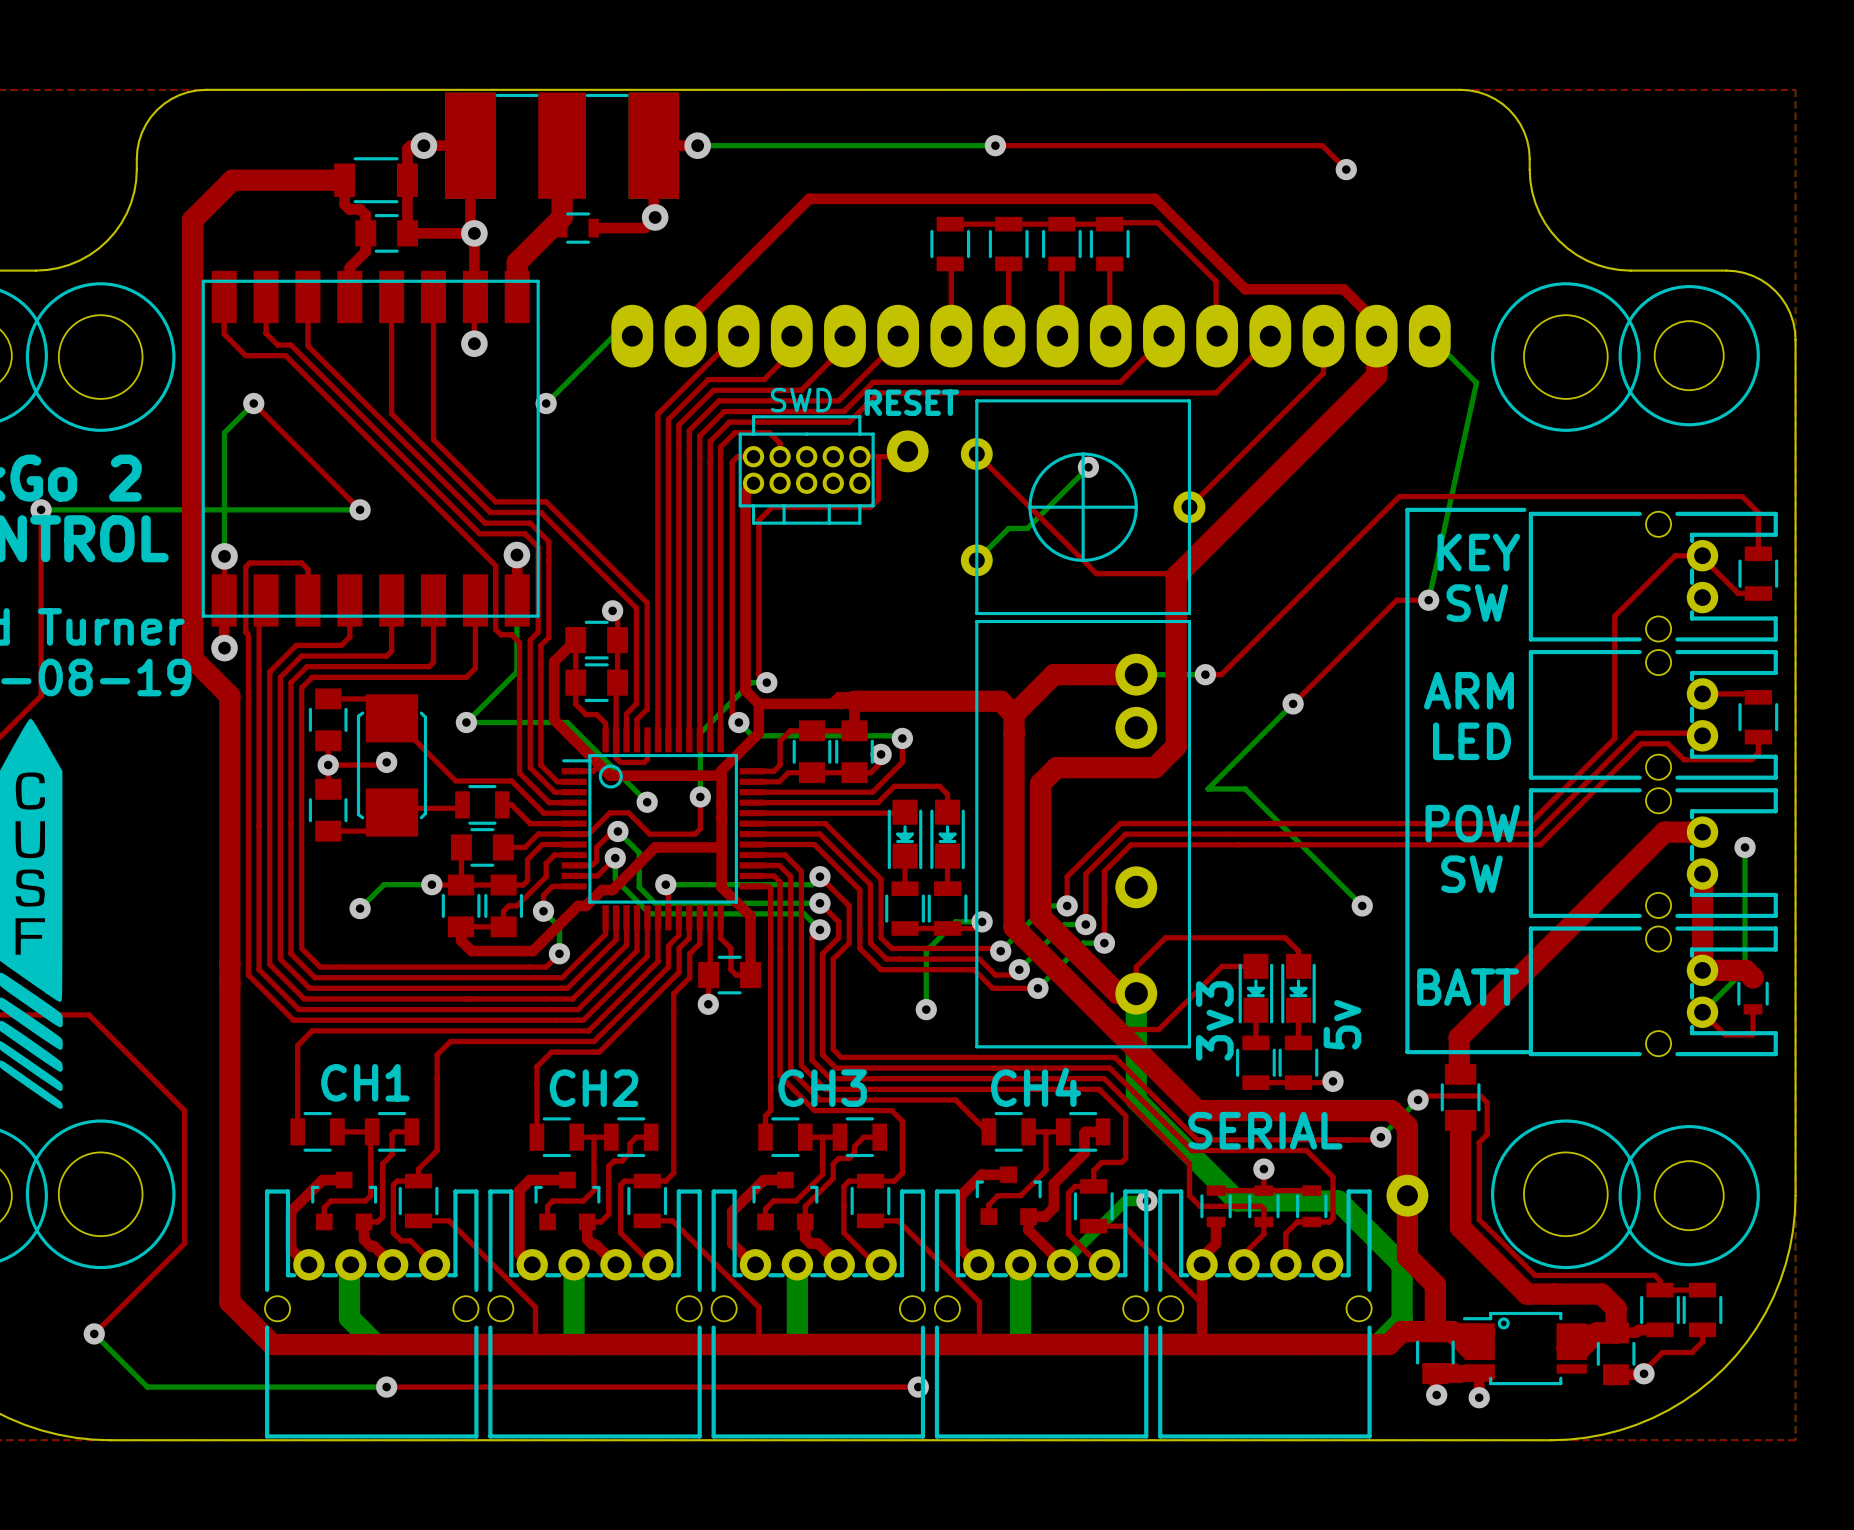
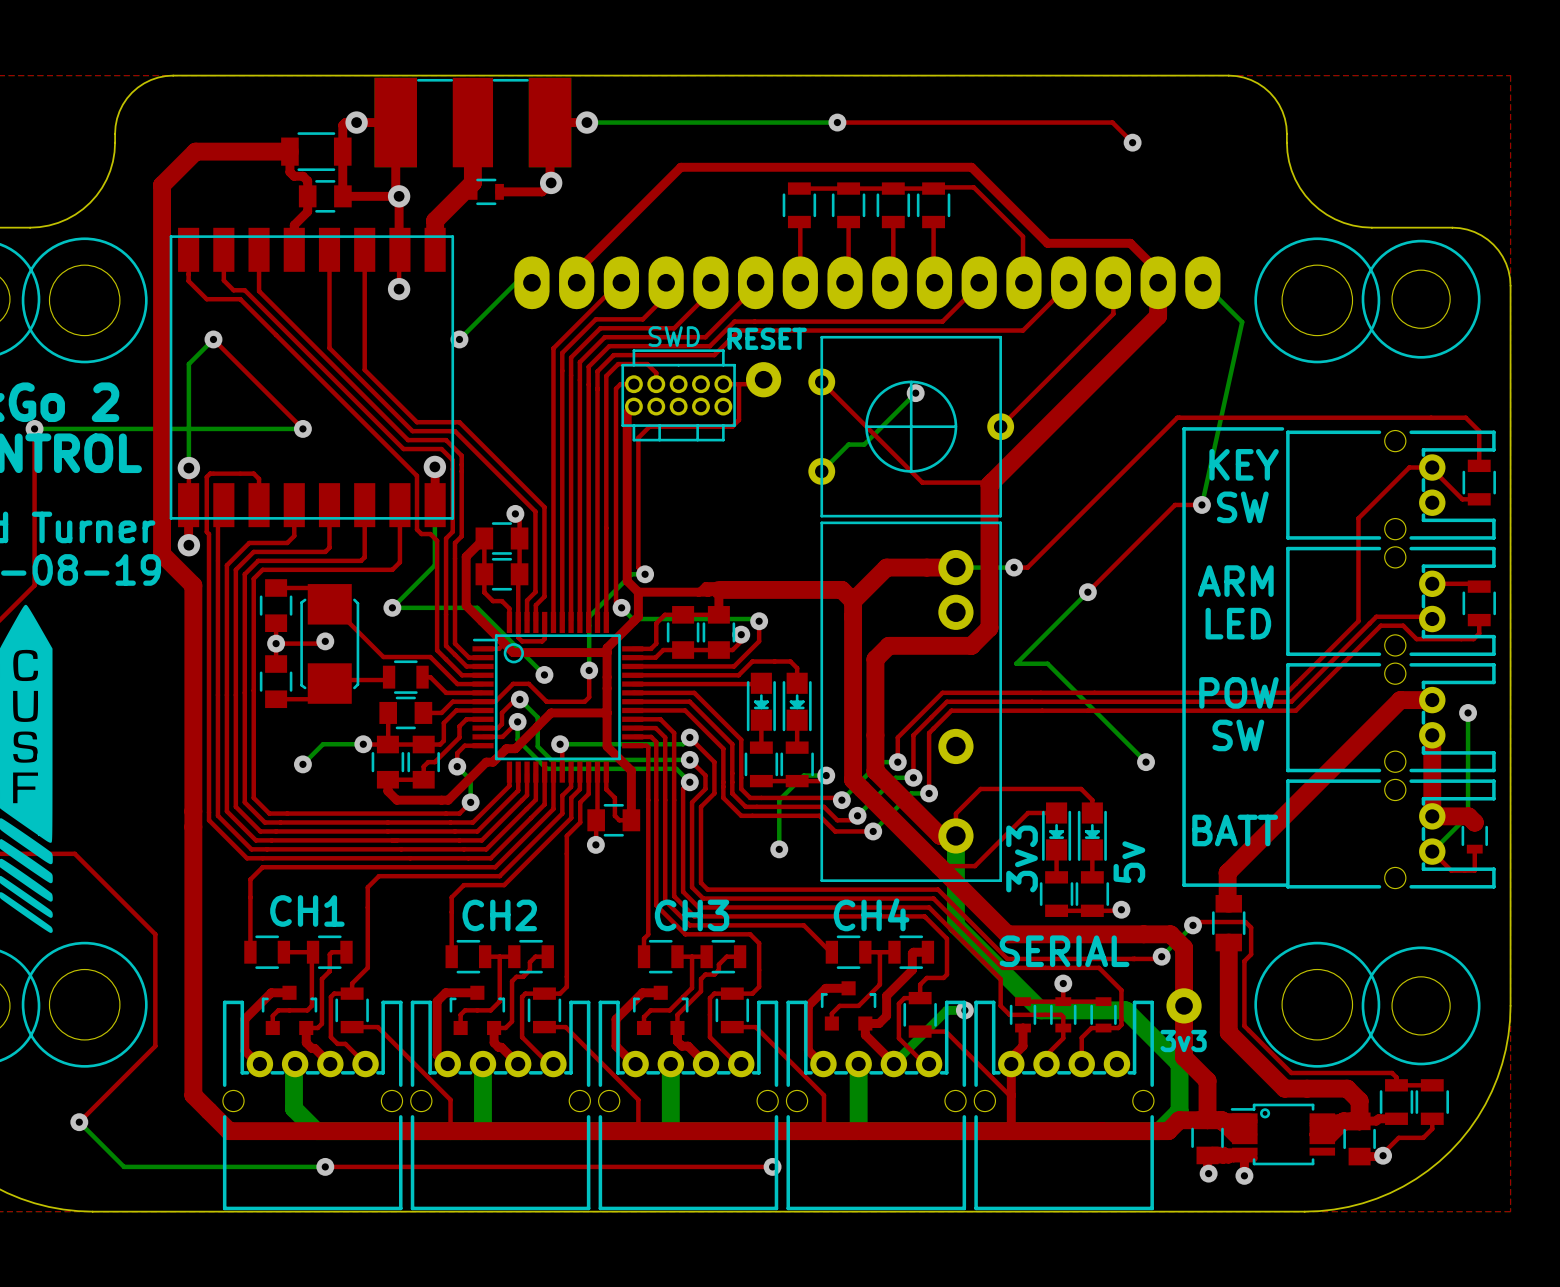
part value: none -> 3v3 (1183, 1041)

